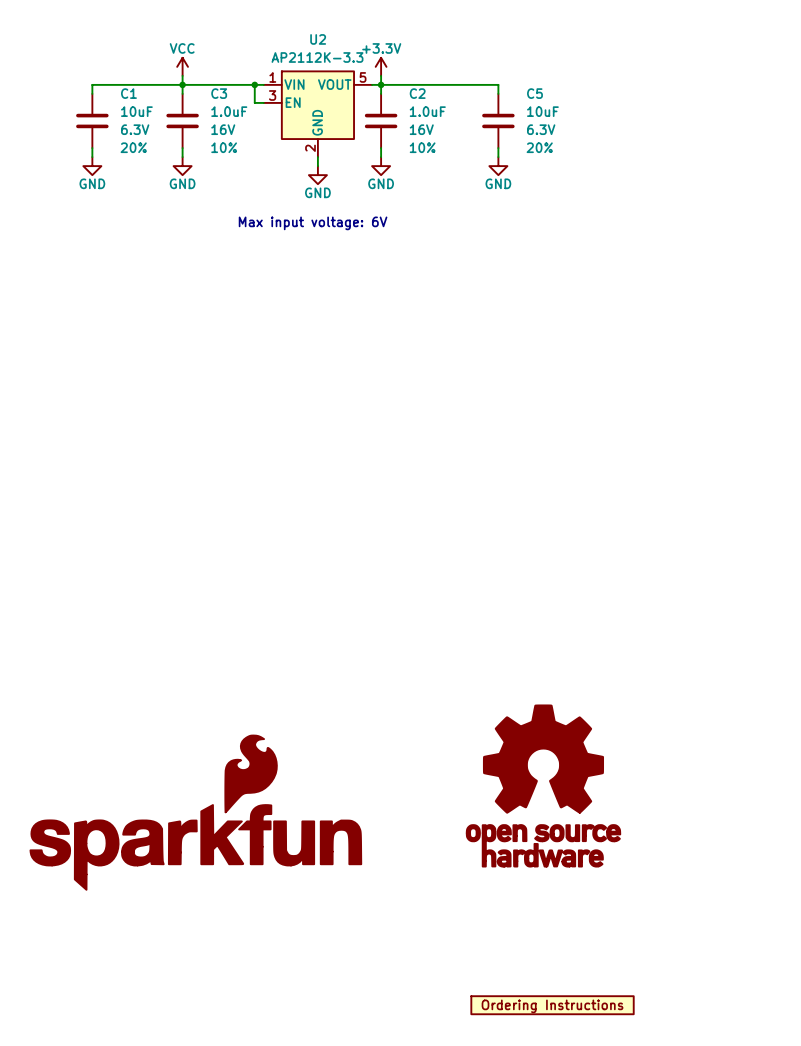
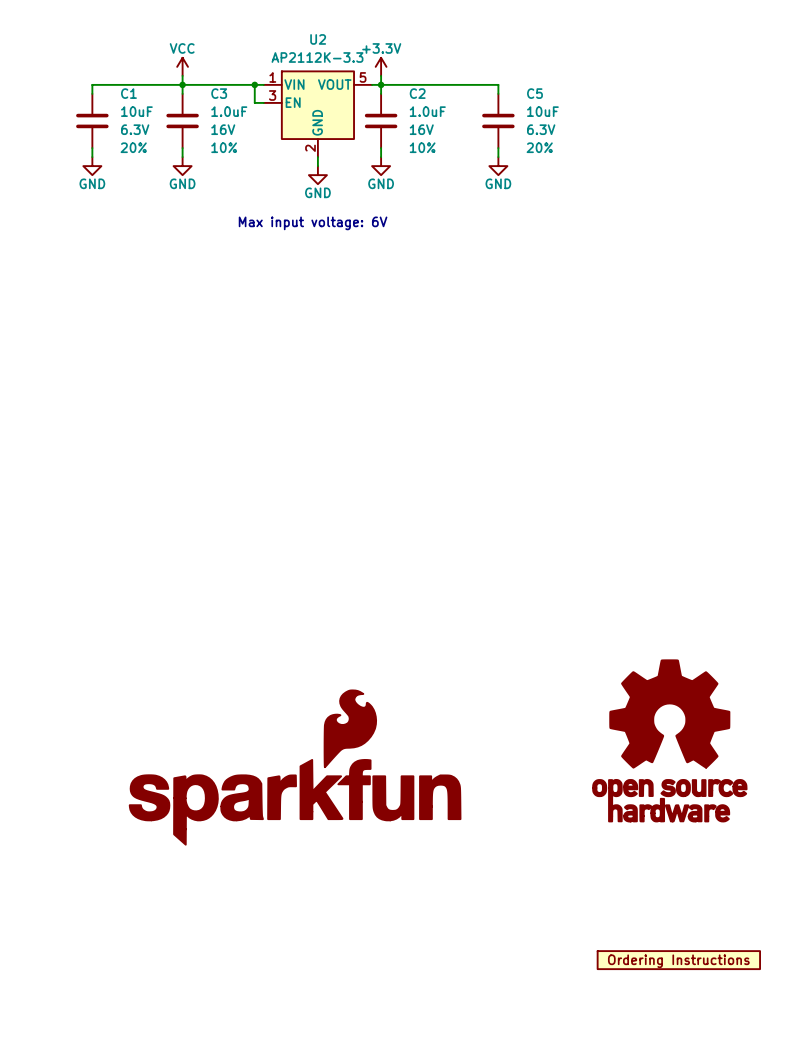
part position: (543, 786) -> (669, 740)
part position: (195, 812) -> (295, 767)
part position: (552, 1005) -> (678, 960)

